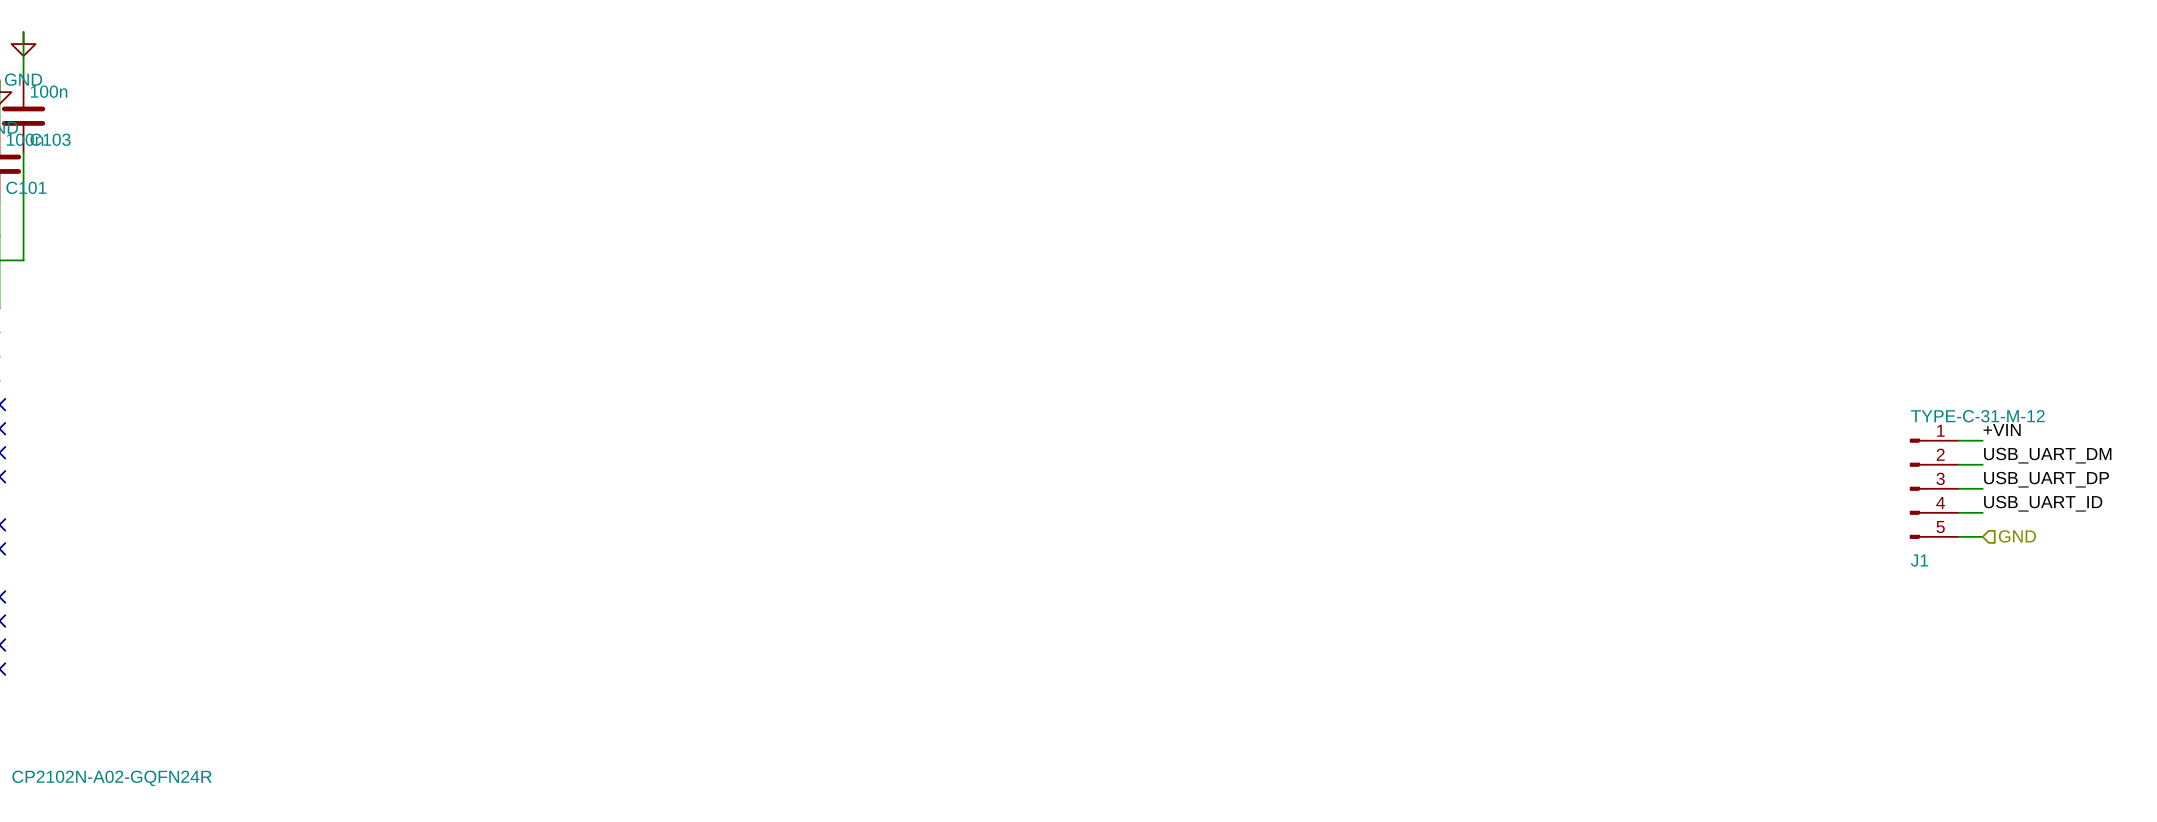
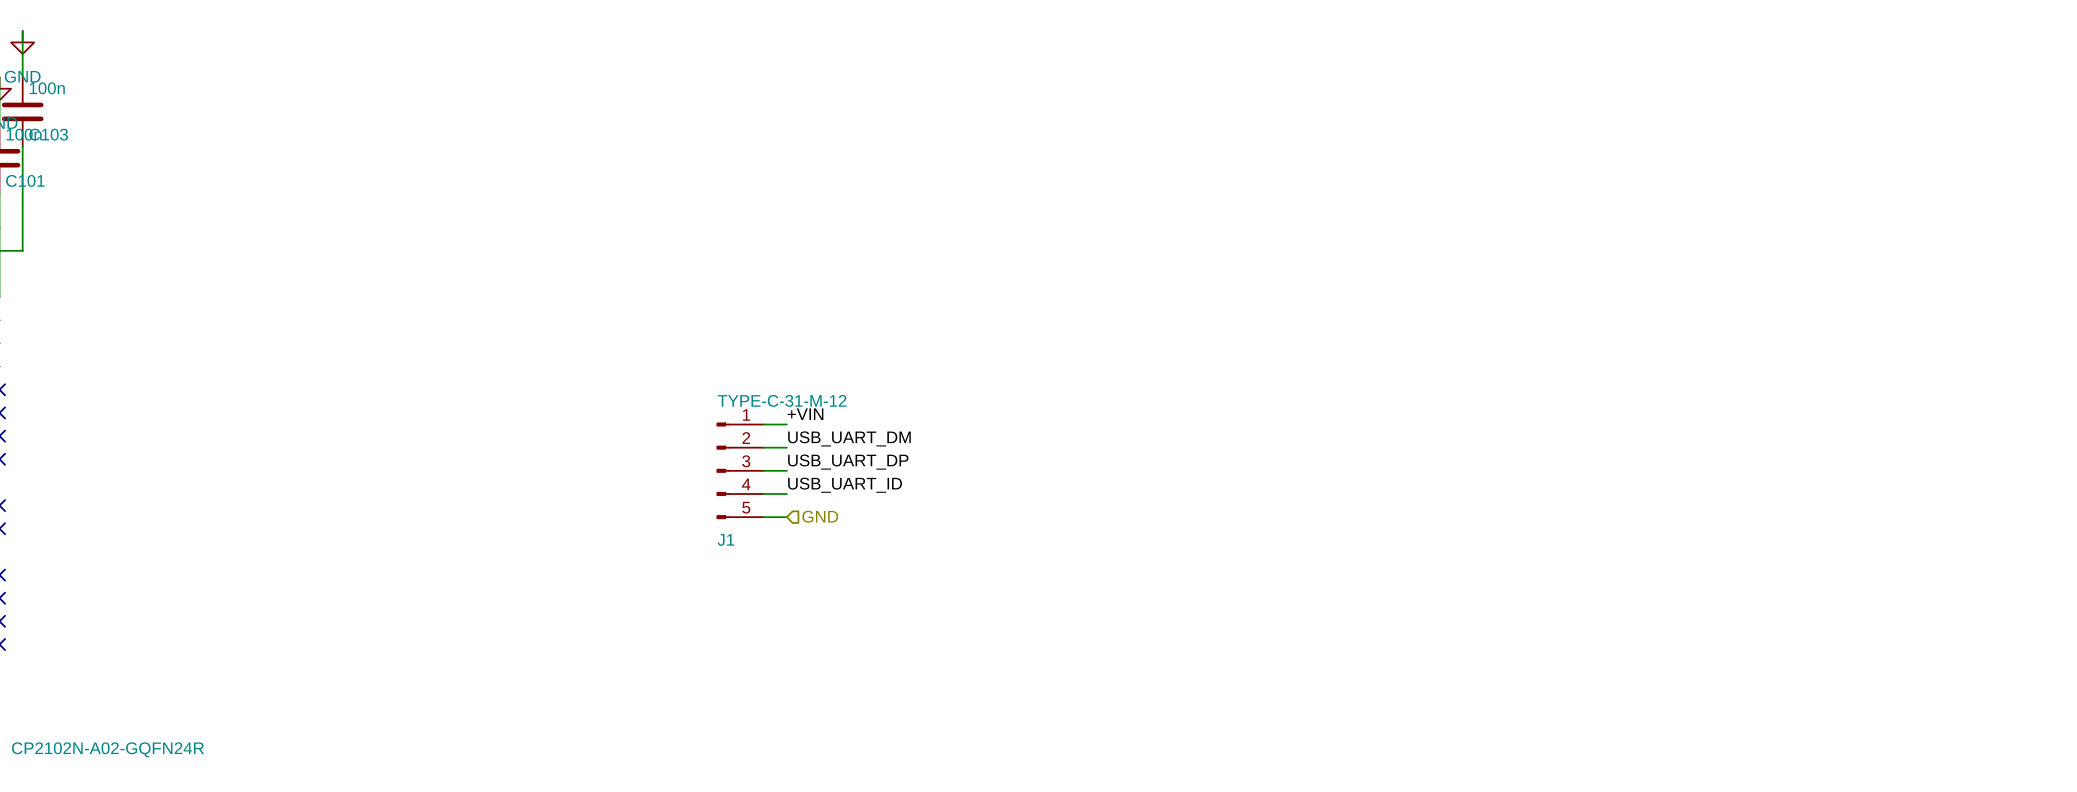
label: none -> +VIN (805, 414)
label: +VIN (2002, 429) -> none
wire: none -> (763, 424) (786, 424)
wire: (1958, 440) (1982, 440) -> none
label: none -> USB_UART_DM (849, 438)
label: USB_UART_DM (2047, 455) -> none
wire: none -> (763, 447) (786, 447)
wire: (1958, 464) (1982, 464) -> none
label: none -> USB_UART_DP (848, 462)
label: USB_UART_DP (2046, 479) -> none
wire: none -> (763, 470) (786, 470)
J1 position: (1934, 488) -> (740, 470)
wire: (1958, 488) (1982, 488) -> none
label: none -> USB_UART_ID (845, 485)
label: USB_UART_ID (2043, 503) -> none
wire: none -> (763, 493) (786, 493)
wire: (1958, 512) (1982, 512) -> none
wire: none -> (763, 517) (786, 517)
hierarchical label: none -> GND (820, 516)
wire: (1958, 536) (1982, 536) -> none
hierarchical label: GND (2017, 536) -> none

